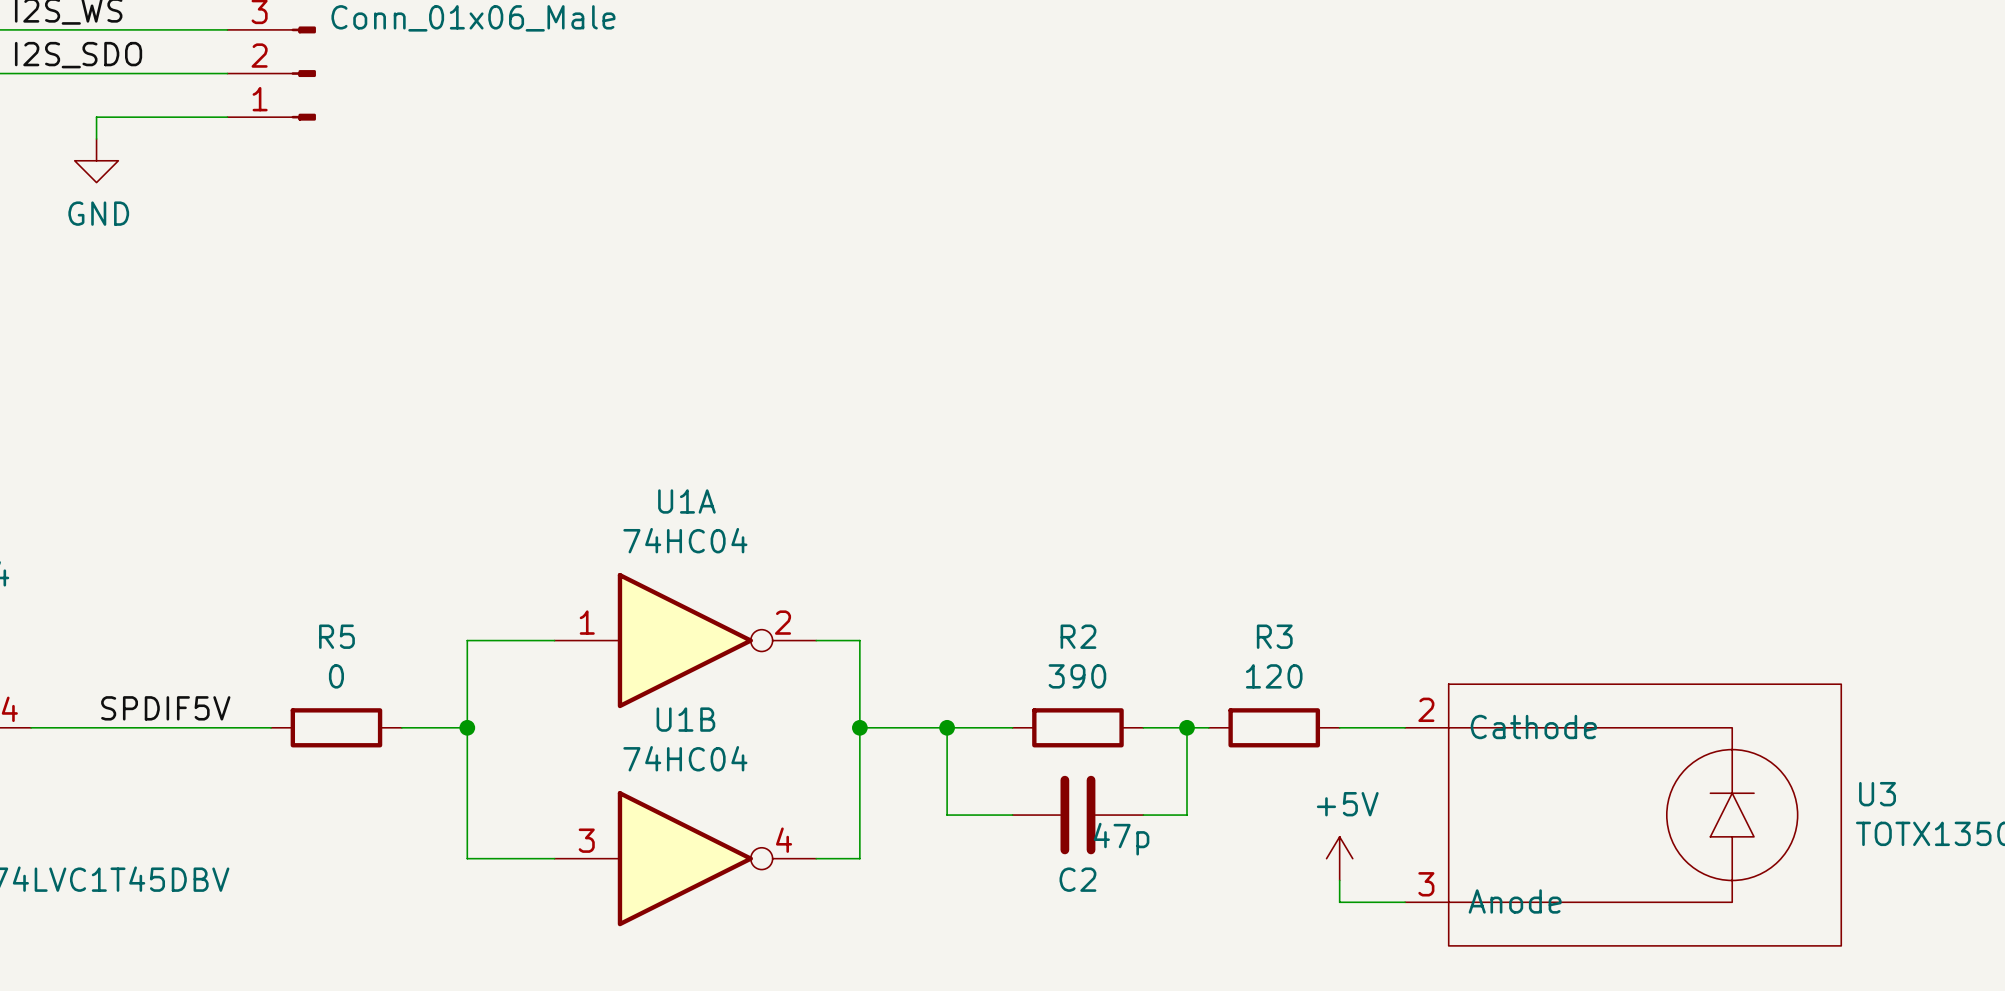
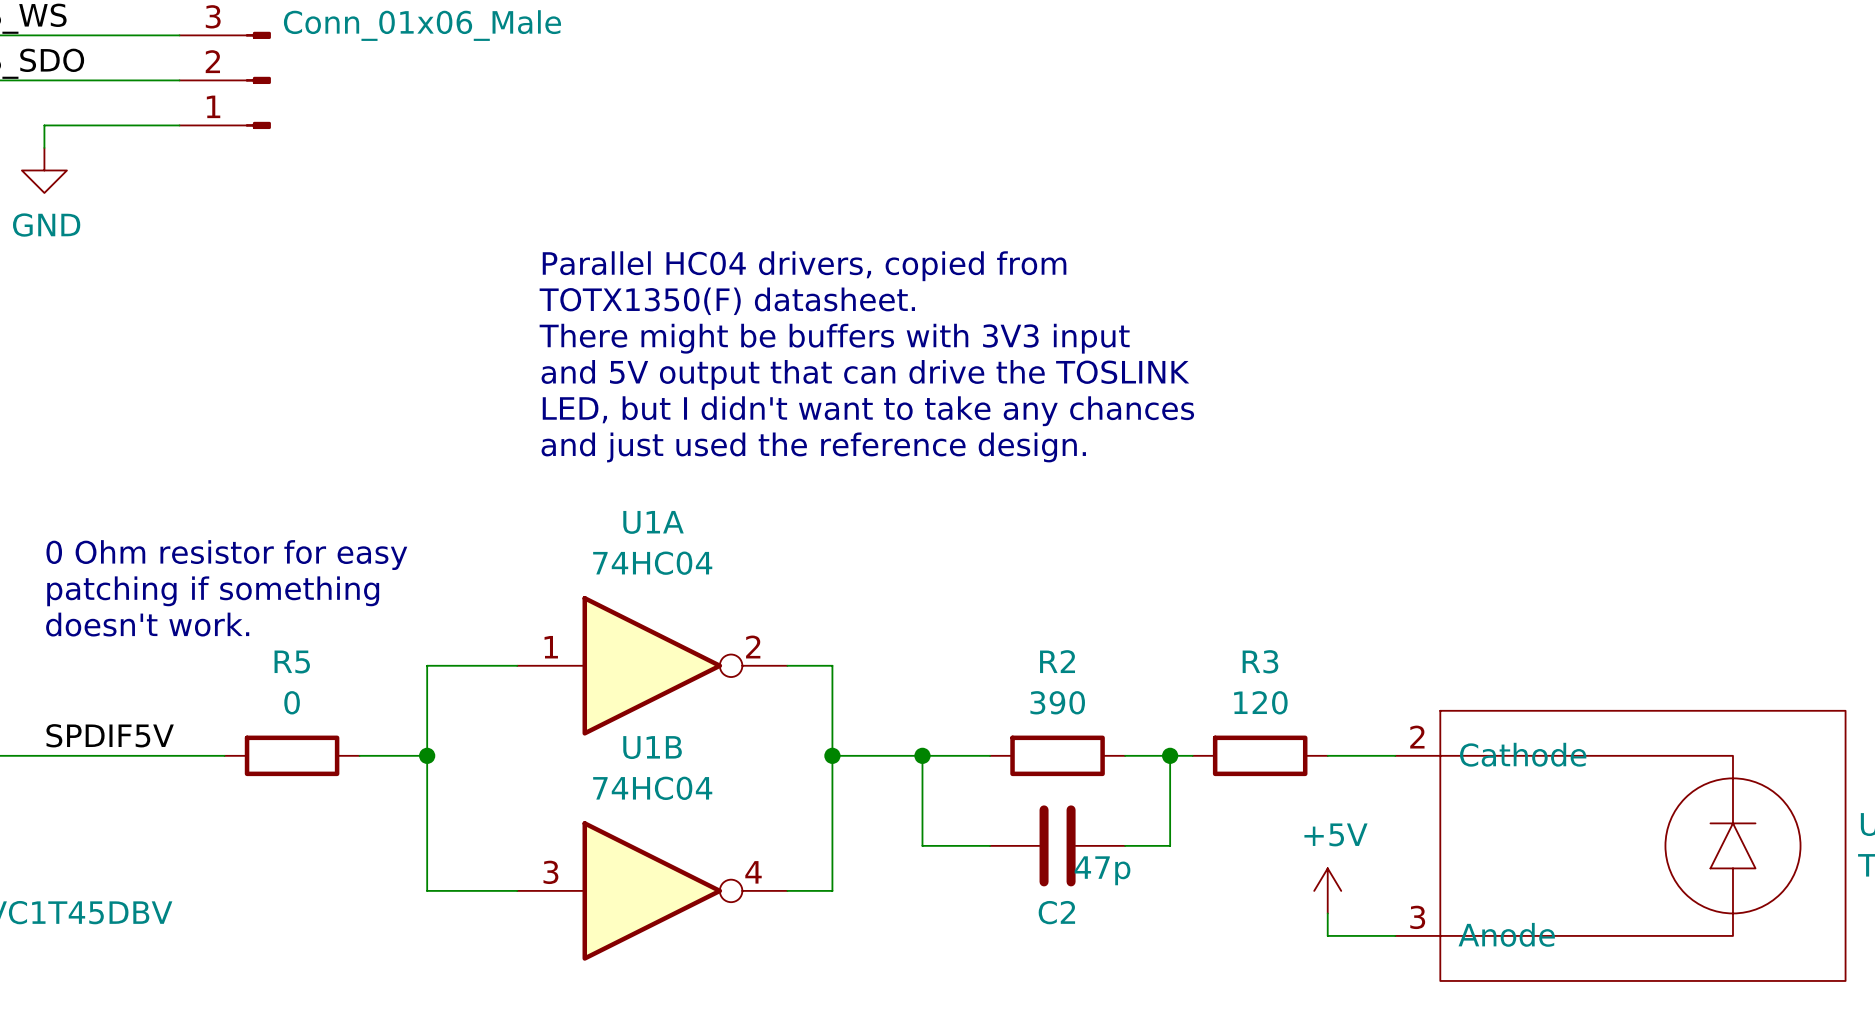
text: none -> Parallel HC04 drivers, copied from (804, 266)
text: none -> TOTX1350(F) datasheet. (727, 301)
text: none -> There might be buffers with 3V3 input (834, 338)
text: none -> and 5V output that can drive the TOSLINK (865, 374)
text: none -> LED, but I didn't want to take any chances (868, 411)
text: none -> and just used the reference design. (813, 447)
text: none -> 0 Ohm resistor for easy (226, 555)
text: none -> patching if something (213, 591)
text: none -> doesn't work. (147, 624)

